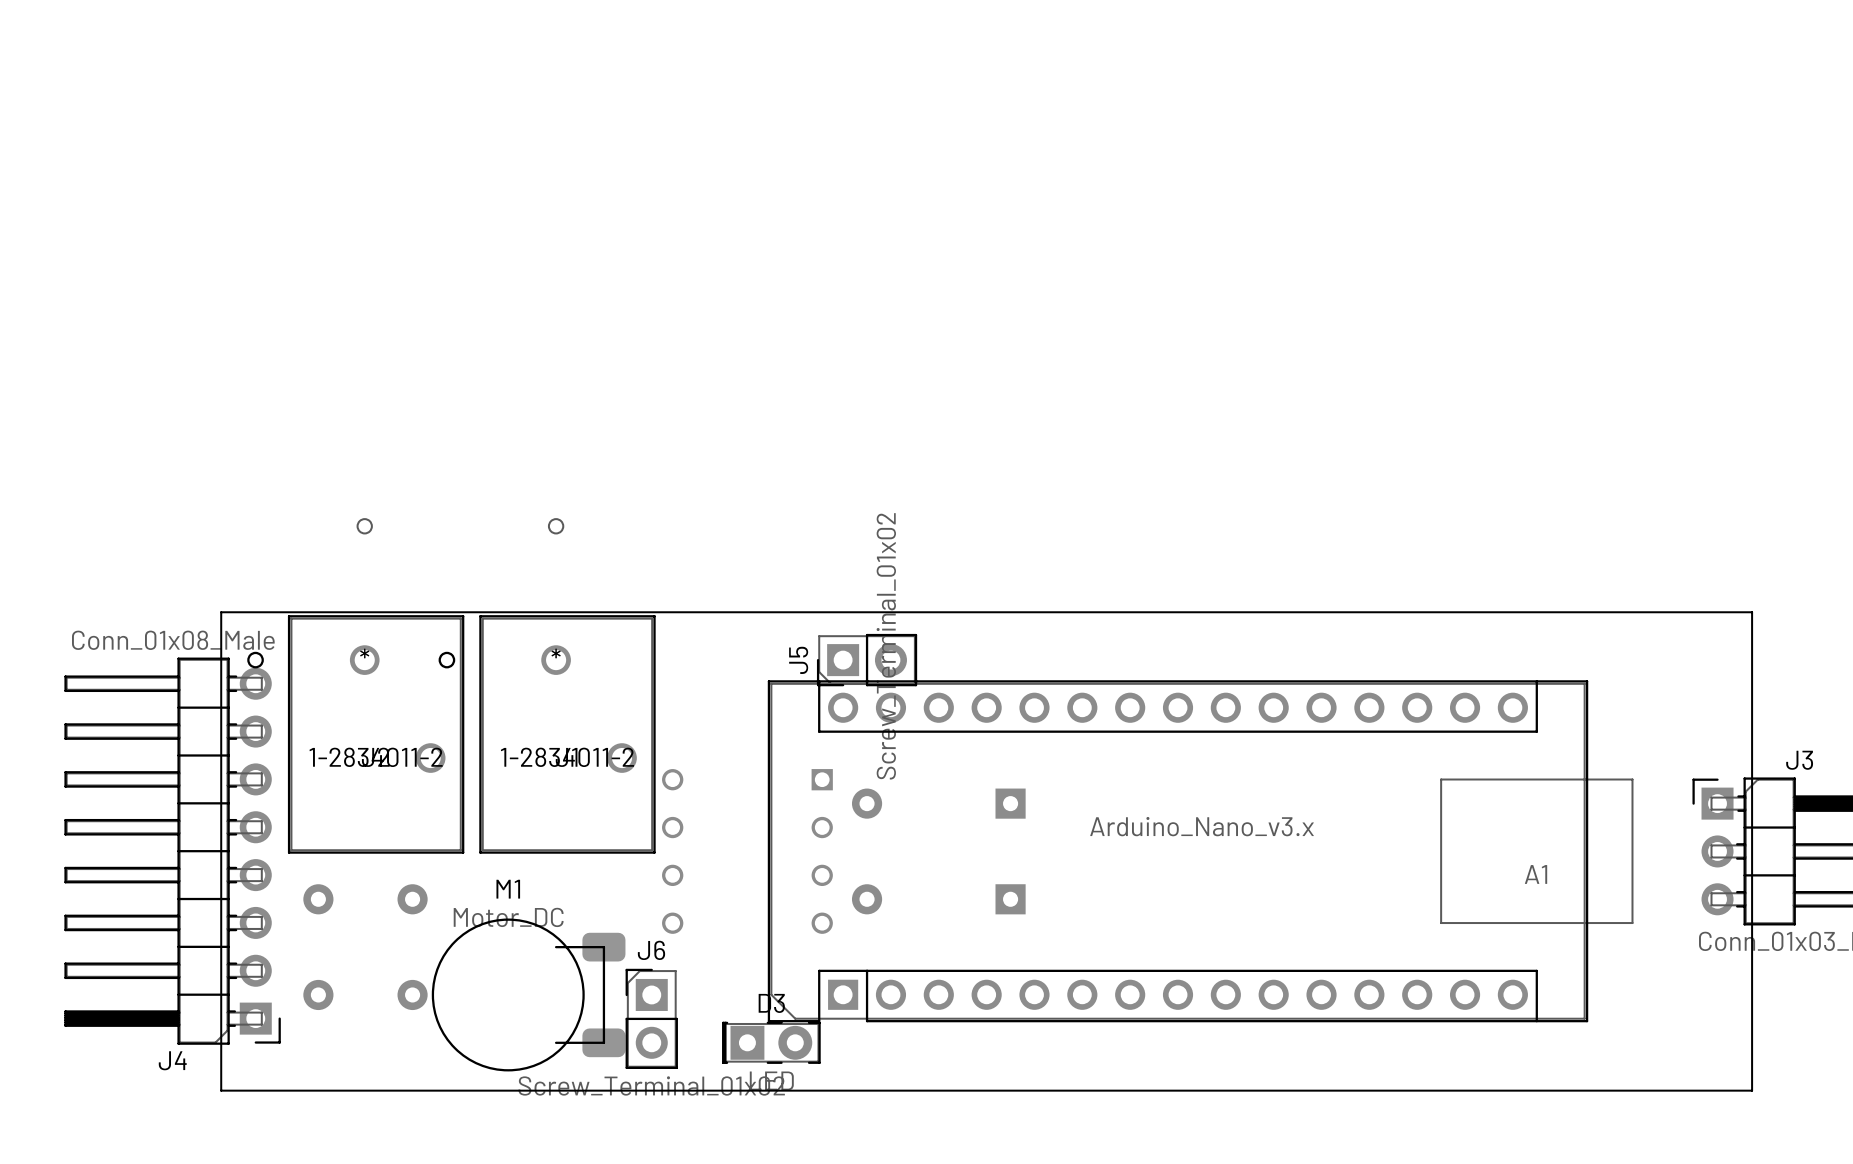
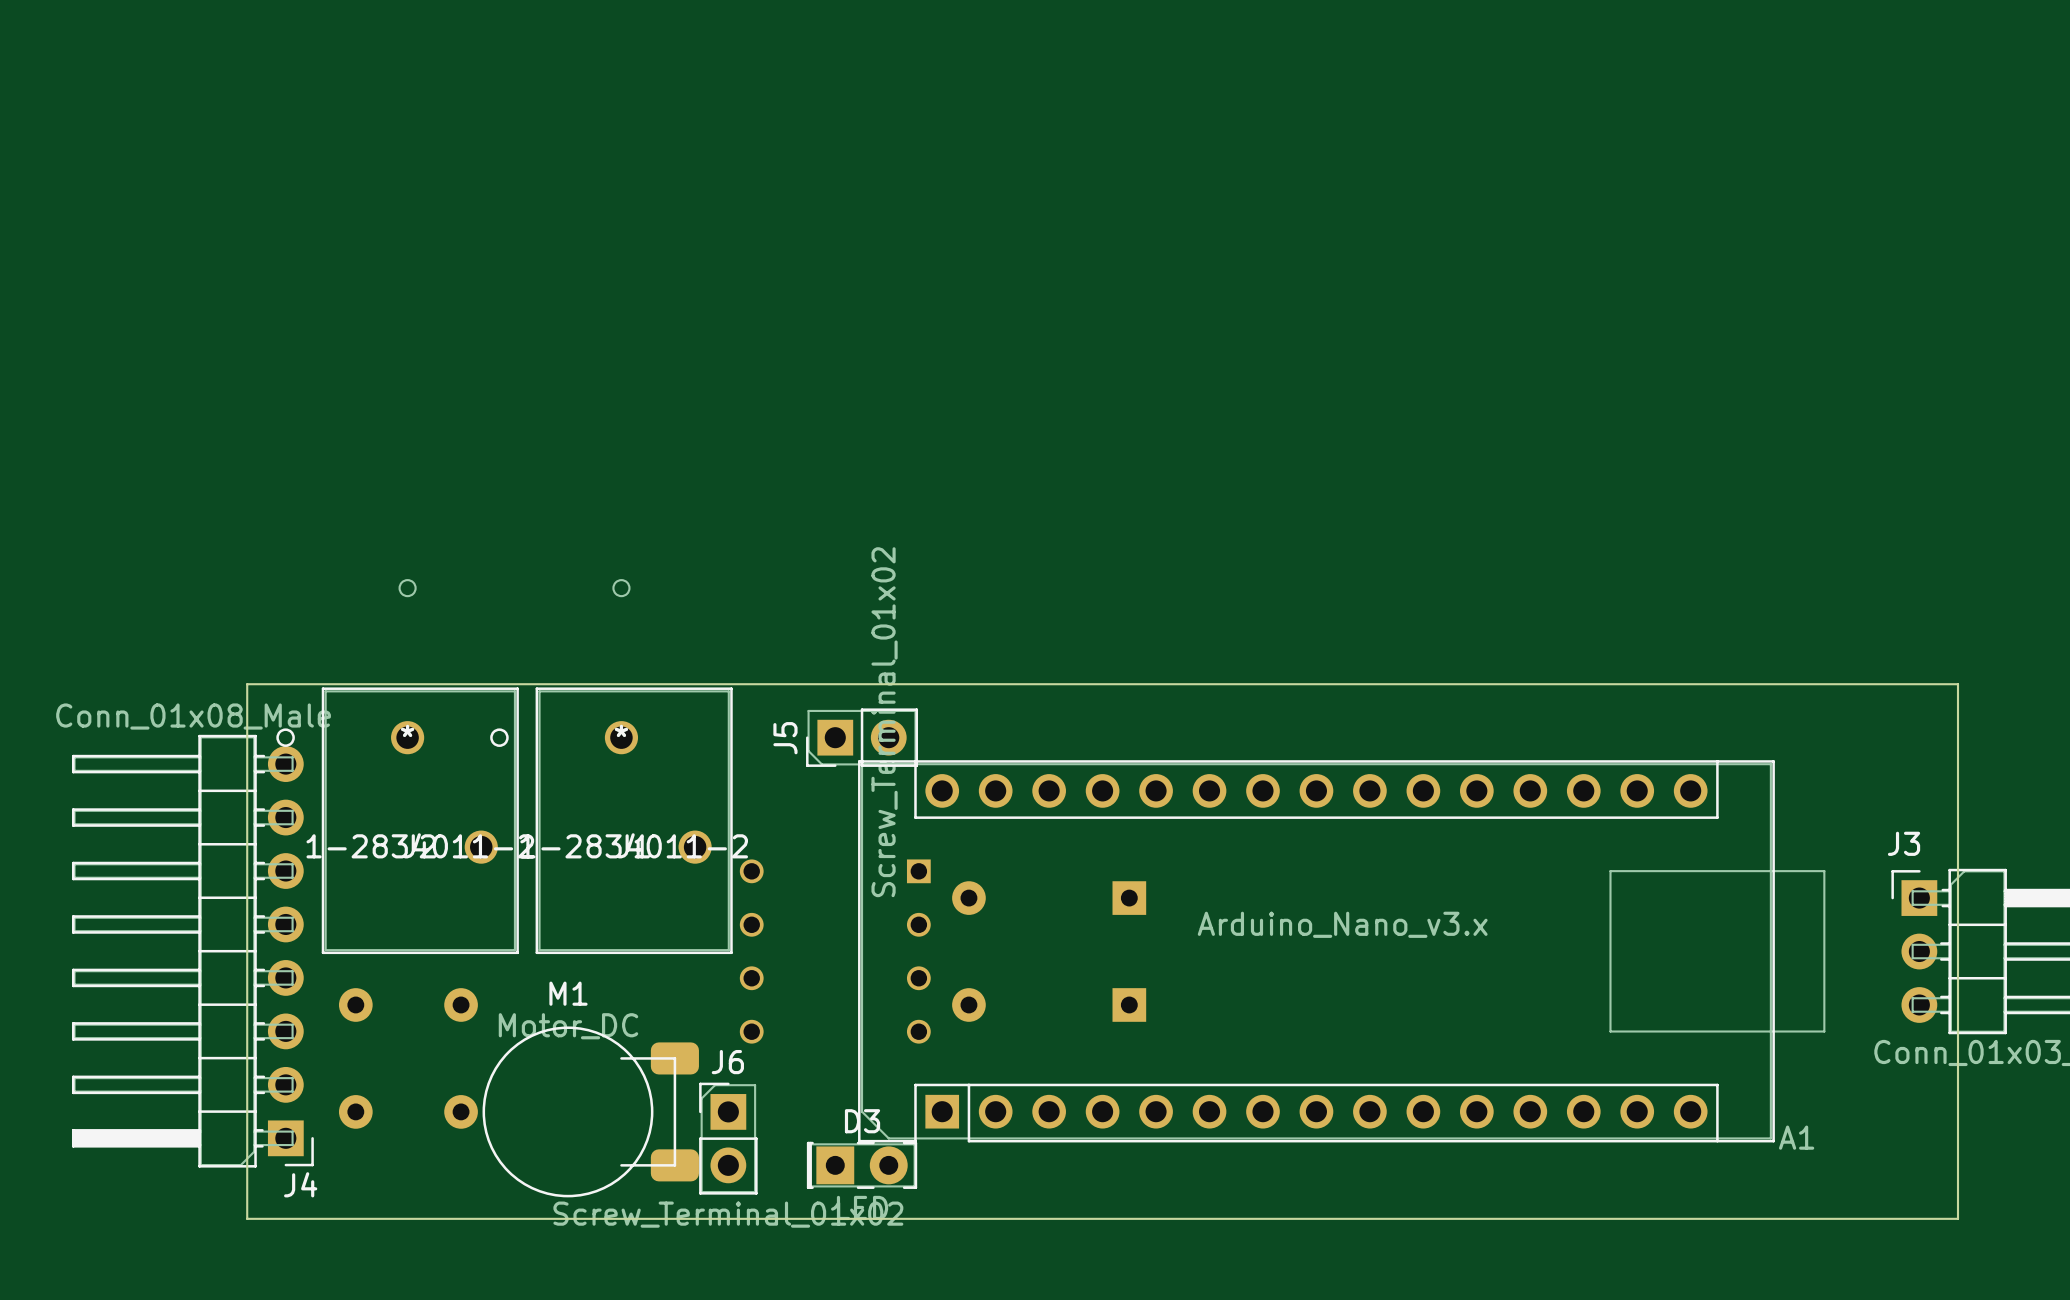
J5 position: (867, 660) -> (862, 737)
J3 name position: J3 (1799, 760) -> J3 (1904, 843)
A1 name position: A1 (1536, 874) -> A1 (1796, 1137)
J4 name position: J4 (172, 1060) -> J4 (300, 1184)

